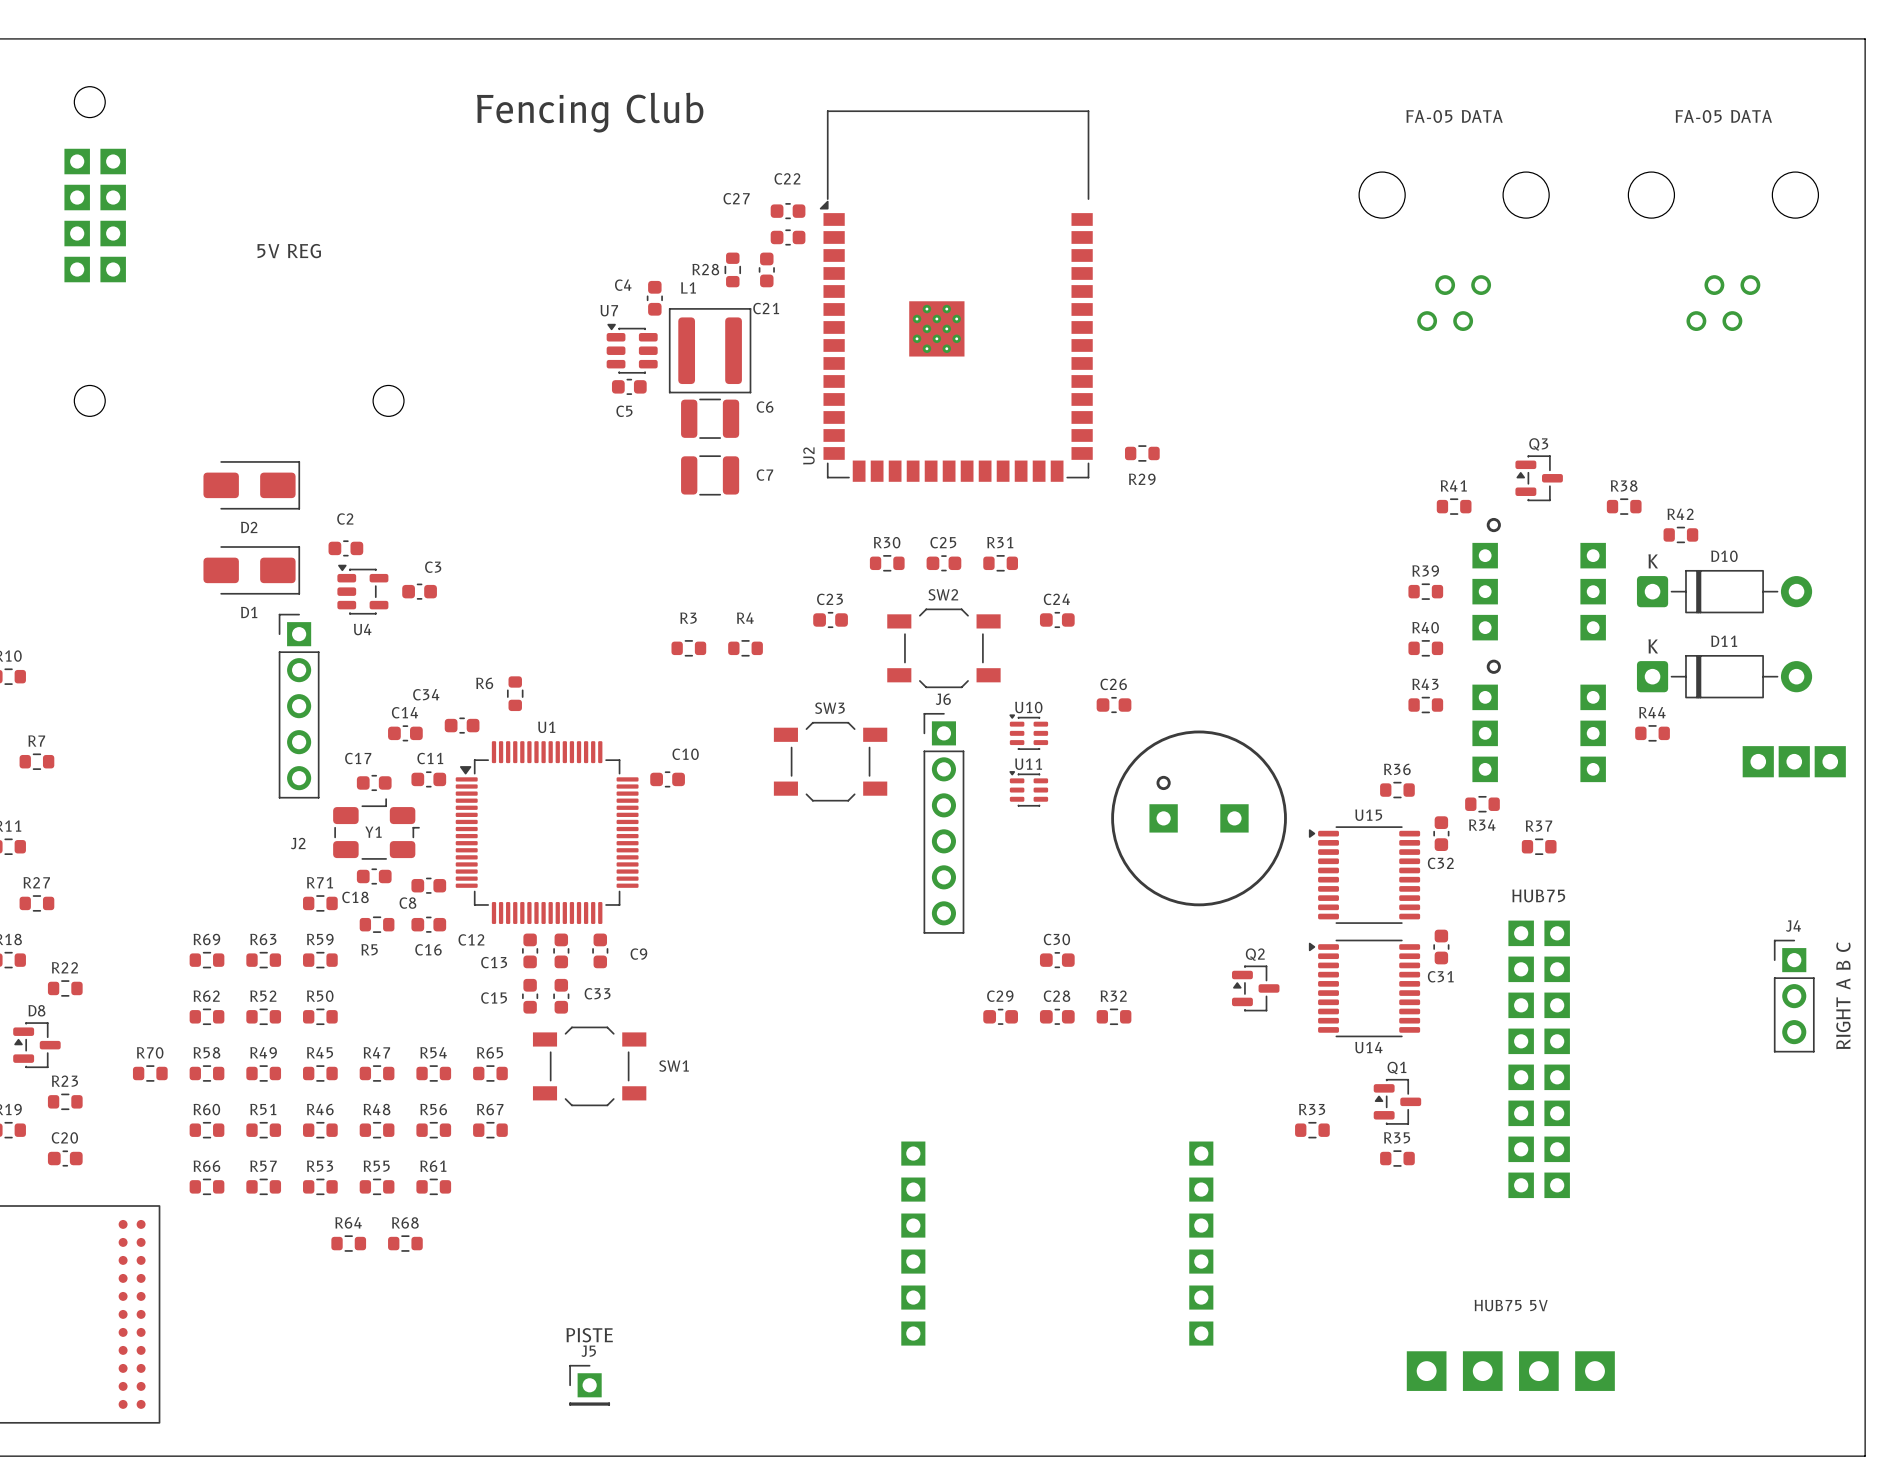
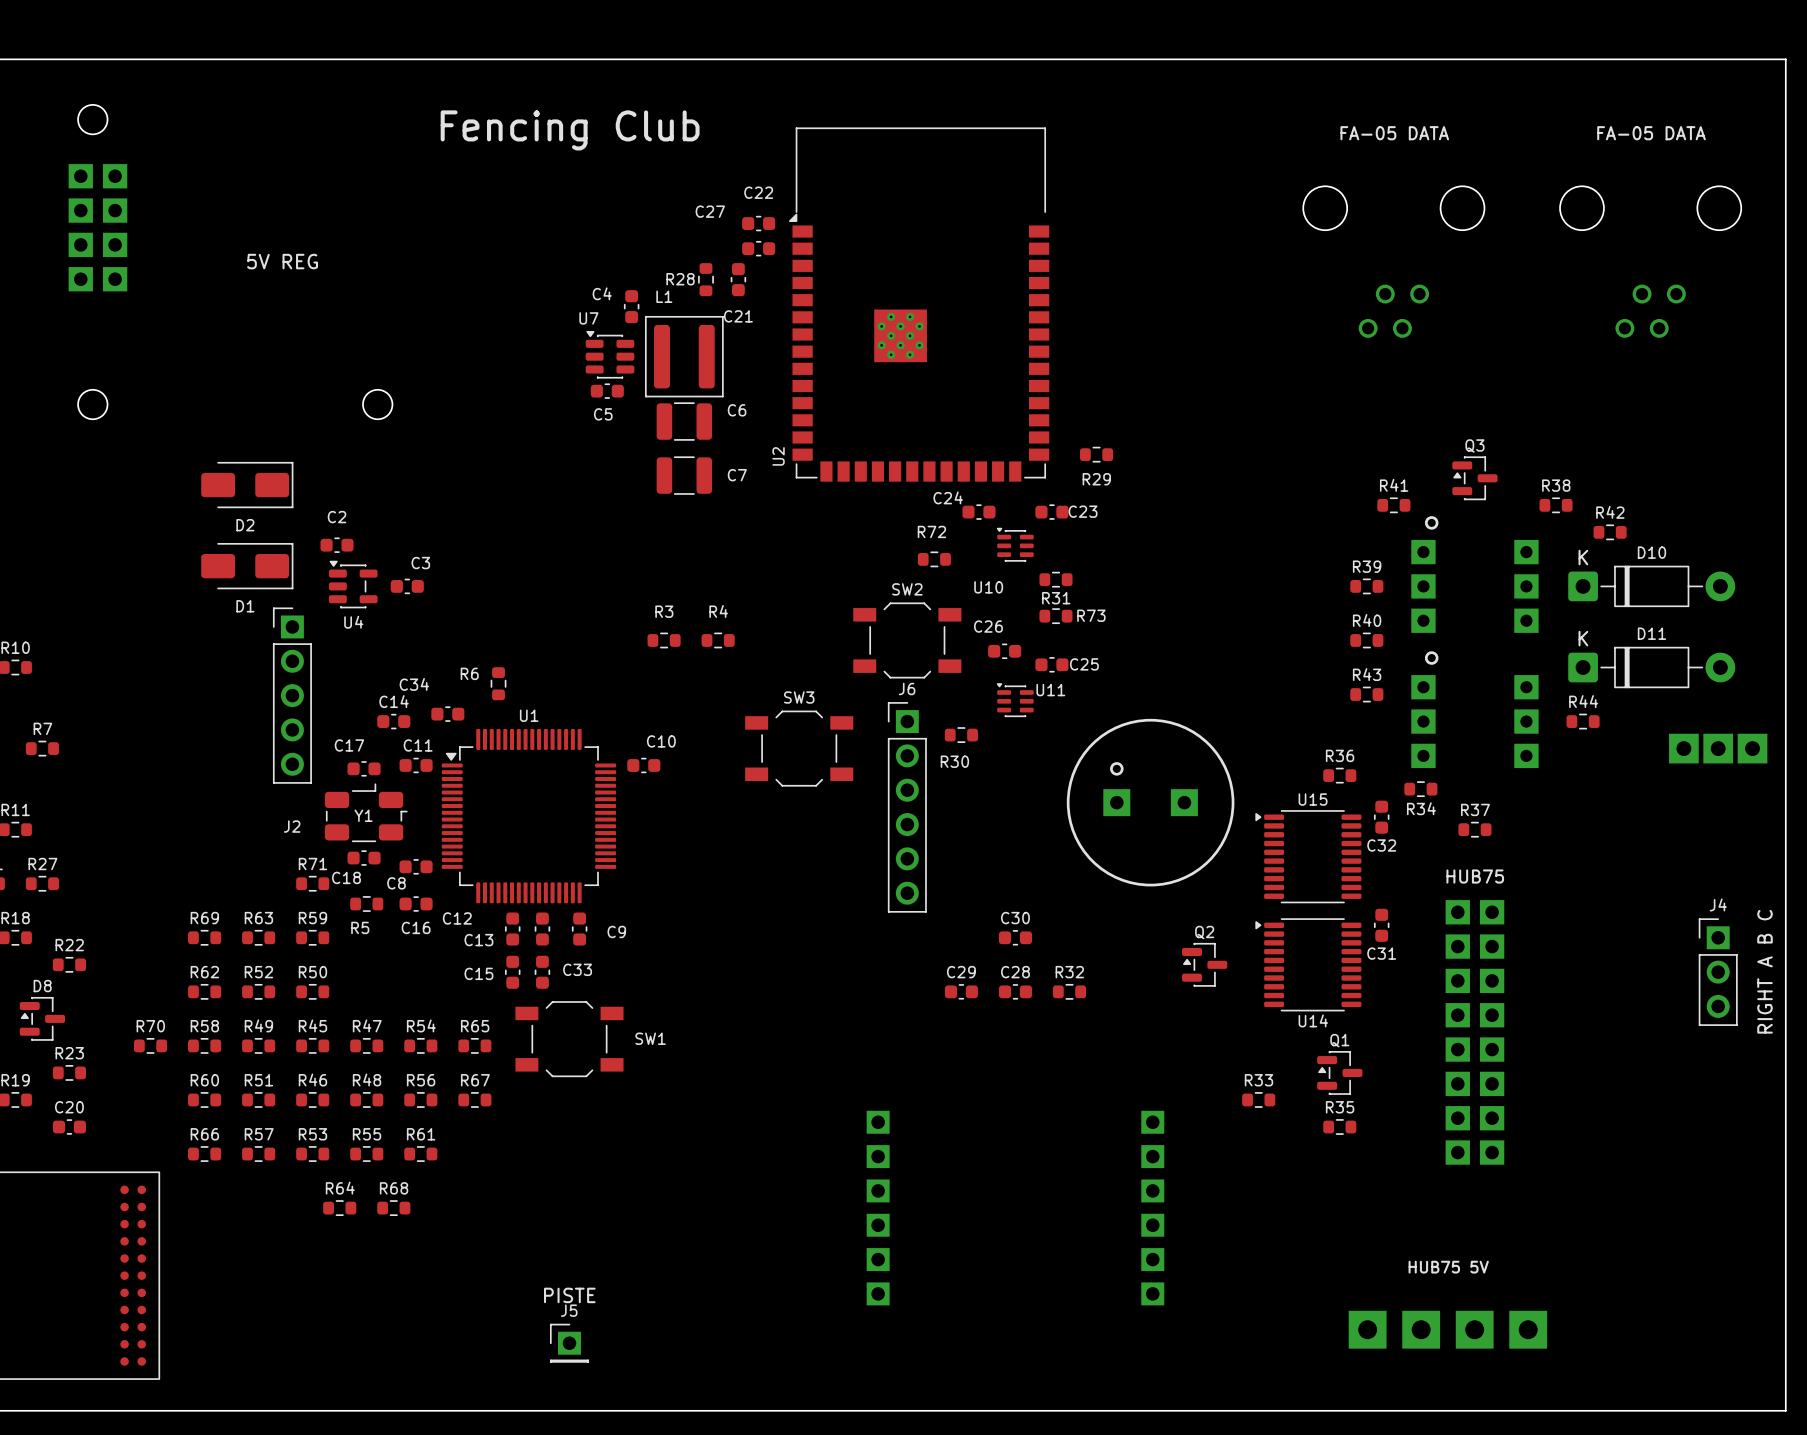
R30 name position: R30 (887, 542) -> R30 (954, 761)
C25 name position: C25 (943, 542) -> C25 (1084, 664)
R31 name position: R31 (1000, 542) -> R31 (1056, 598)
R30 position: (887, 563) -> (961, 735)
C25 position: (943, 563) -> (1051, 664)
R72: none -> (934, 559)
R31 position: (1000, 563) -> (1056, 579)
C23 name position: C23 (829, 599) -> C23 (1083, 511)
C24 name position: C24 (1056, 599) -> C24 (948, 497)
C23 position: (830, 619) -> (1051, 512)
C24 position: (1057, 619) -> (978, 512)
R73: none -> (1056, 616)
C26 name position: C26 (1113, 684) -> C26 (988, 626)
C26 position: (1114, 705) -> (1004, 651)
U10 name position: U10 (1028, 707) -> U10 (988, 587)
U10 position: (1028, 732) -> (1015, 544)
U11 name position: U11 (1028, 764) -> U11 (1050, 690)
U11 position: (1028, 788) -> (1015, 700)

